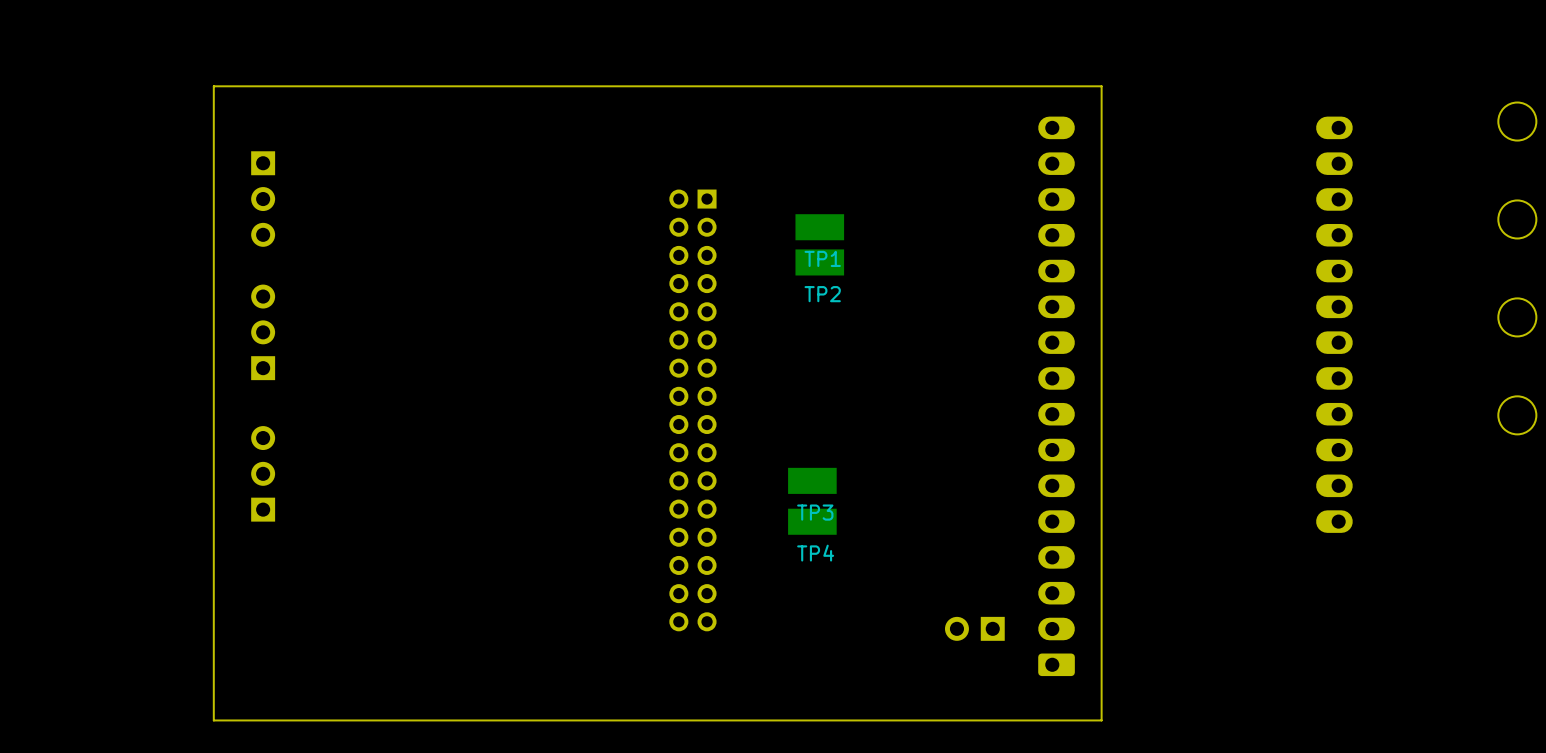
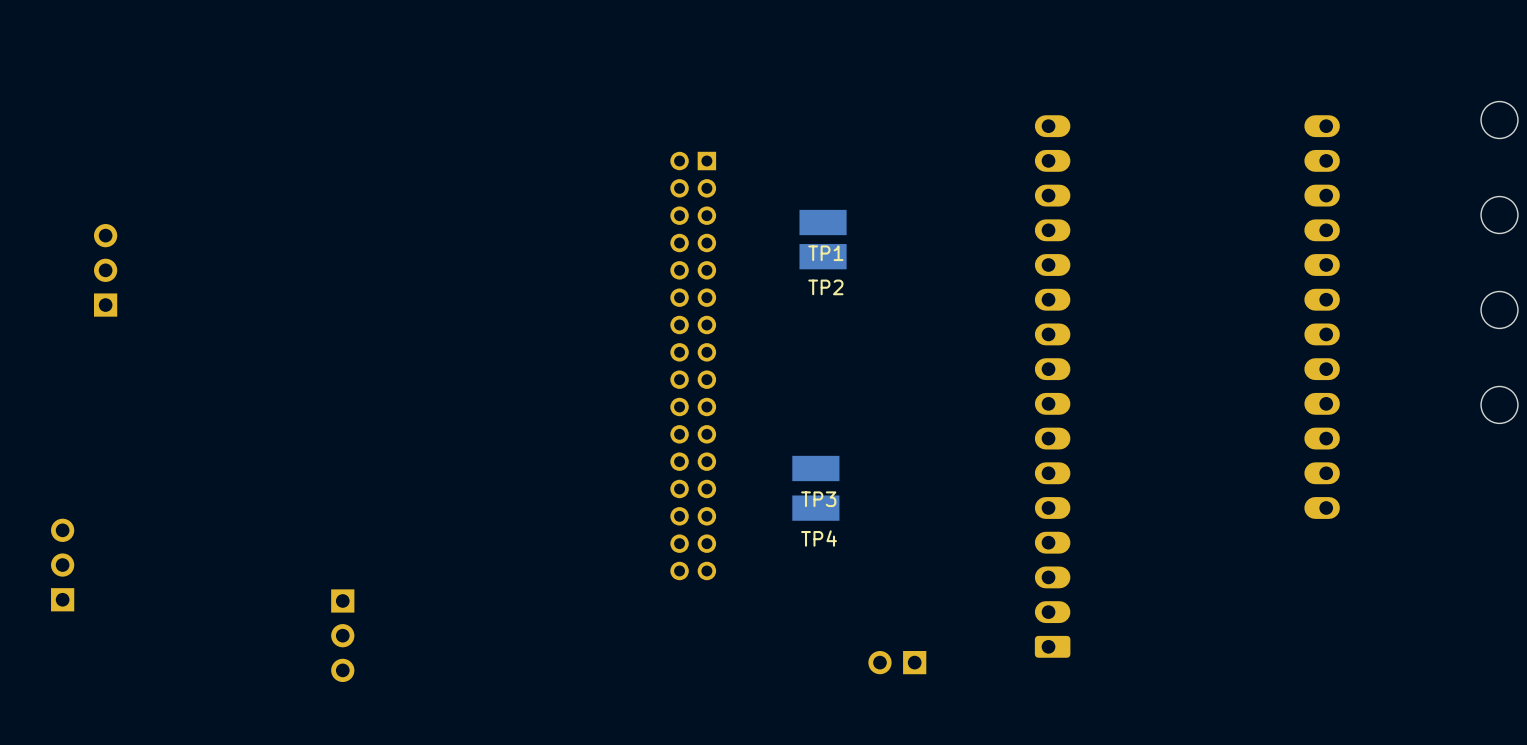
board edge: (1101, 86) (213, 86) (213, 720) (1101, 720) (1101, 86) -> none
part: (263, 199) -> none
part: none -> (105, 270)
part: (263, 332) -> none
part position: (692, 410) -> (693, 366)
part: (263, 473) -> none
part: none -> (62, 565)
part position: (974, 628) -> (897, 662)
part: none -> (342, 635)

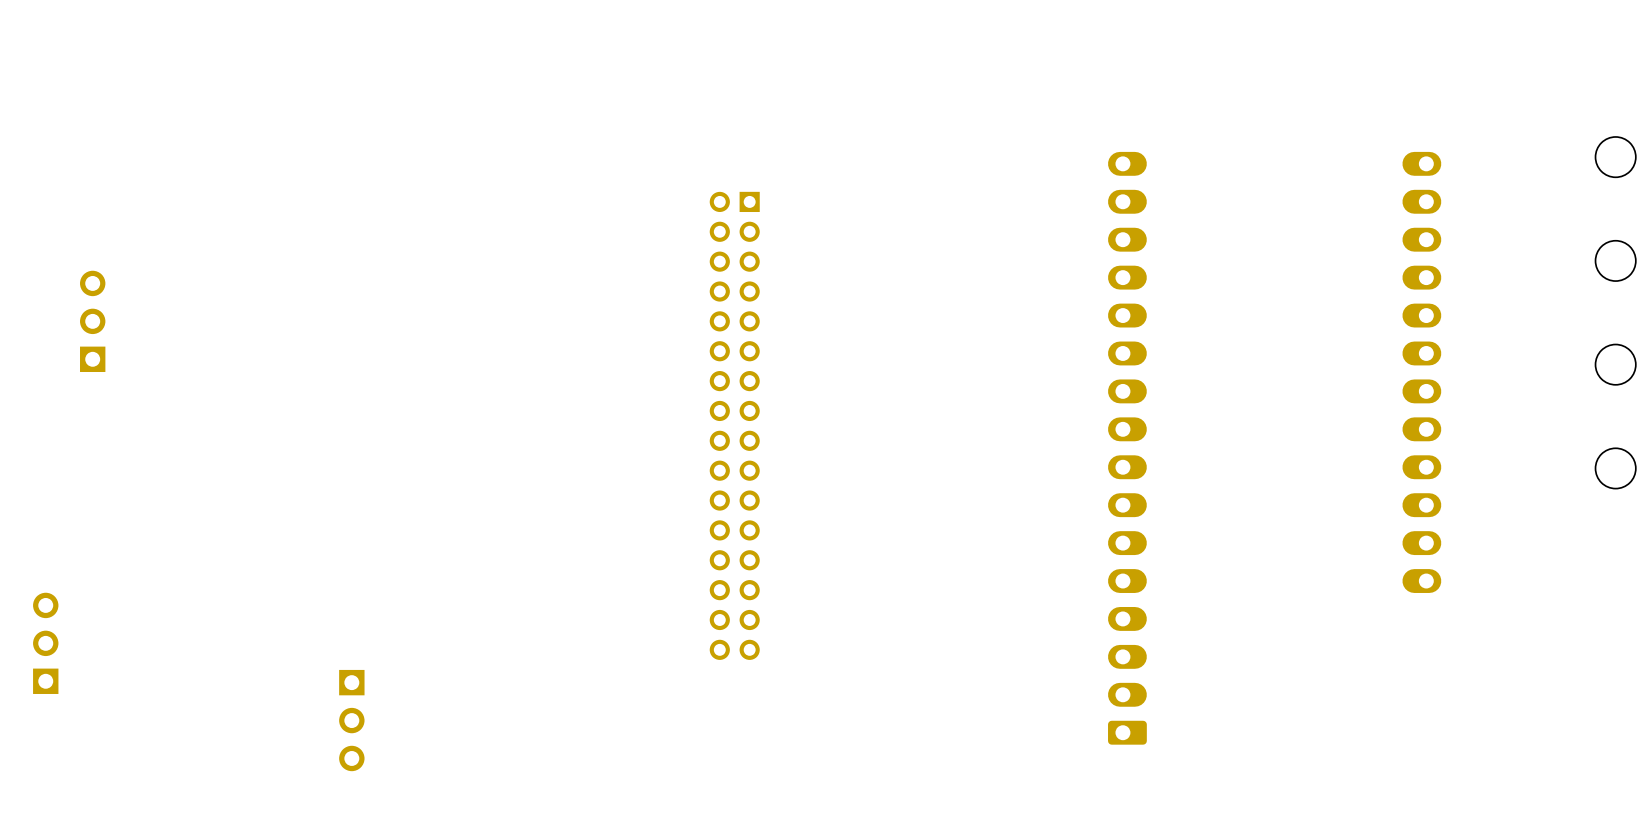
TP1: (823, 222) -> none
TP2: (823, 256) -> none
TP3: (815, 468) -> none
TP4: (815, 508) -> none
part: (897, 662) -> none

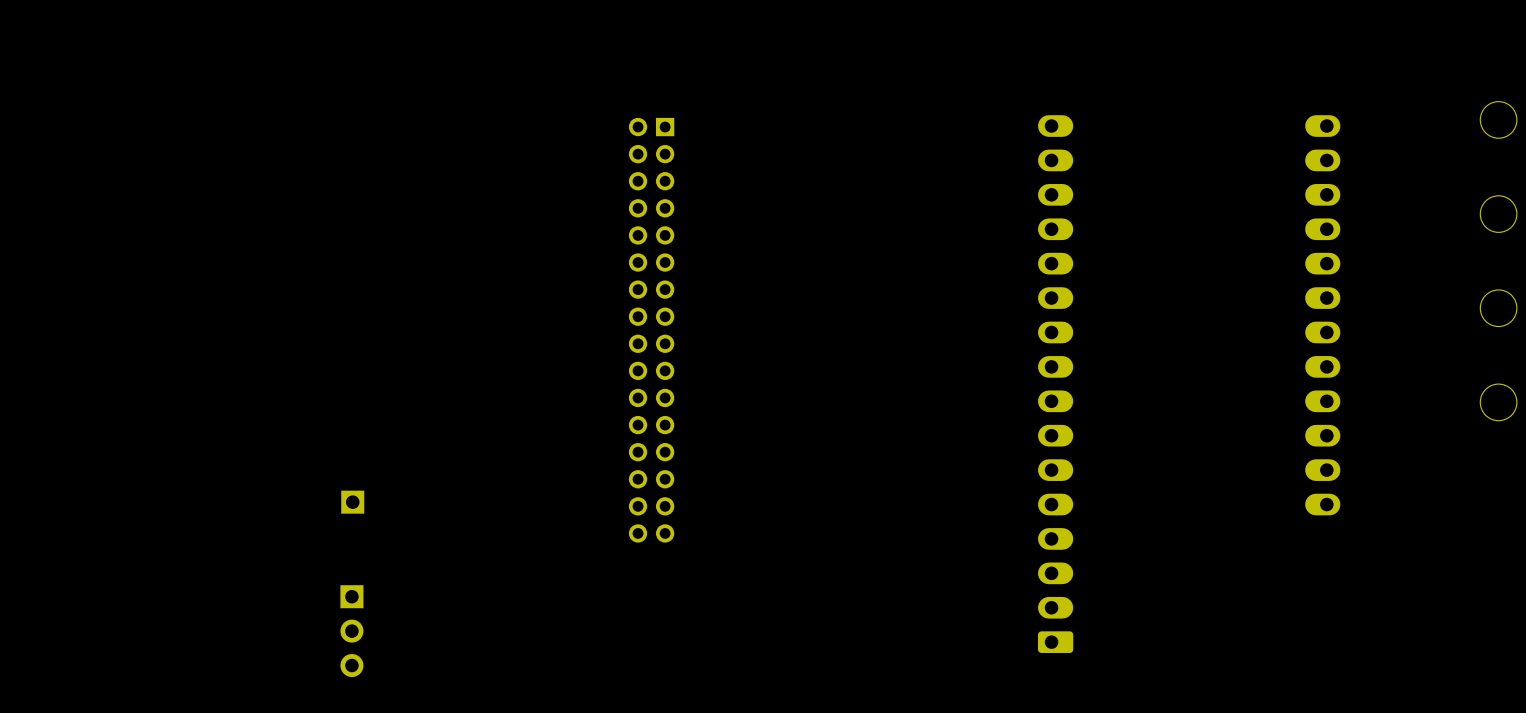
part: (92, 321) -> none
part position: (734, 425) -> (651, 330)
part: none -> (352, 502)
part: (45, 643) -> none

